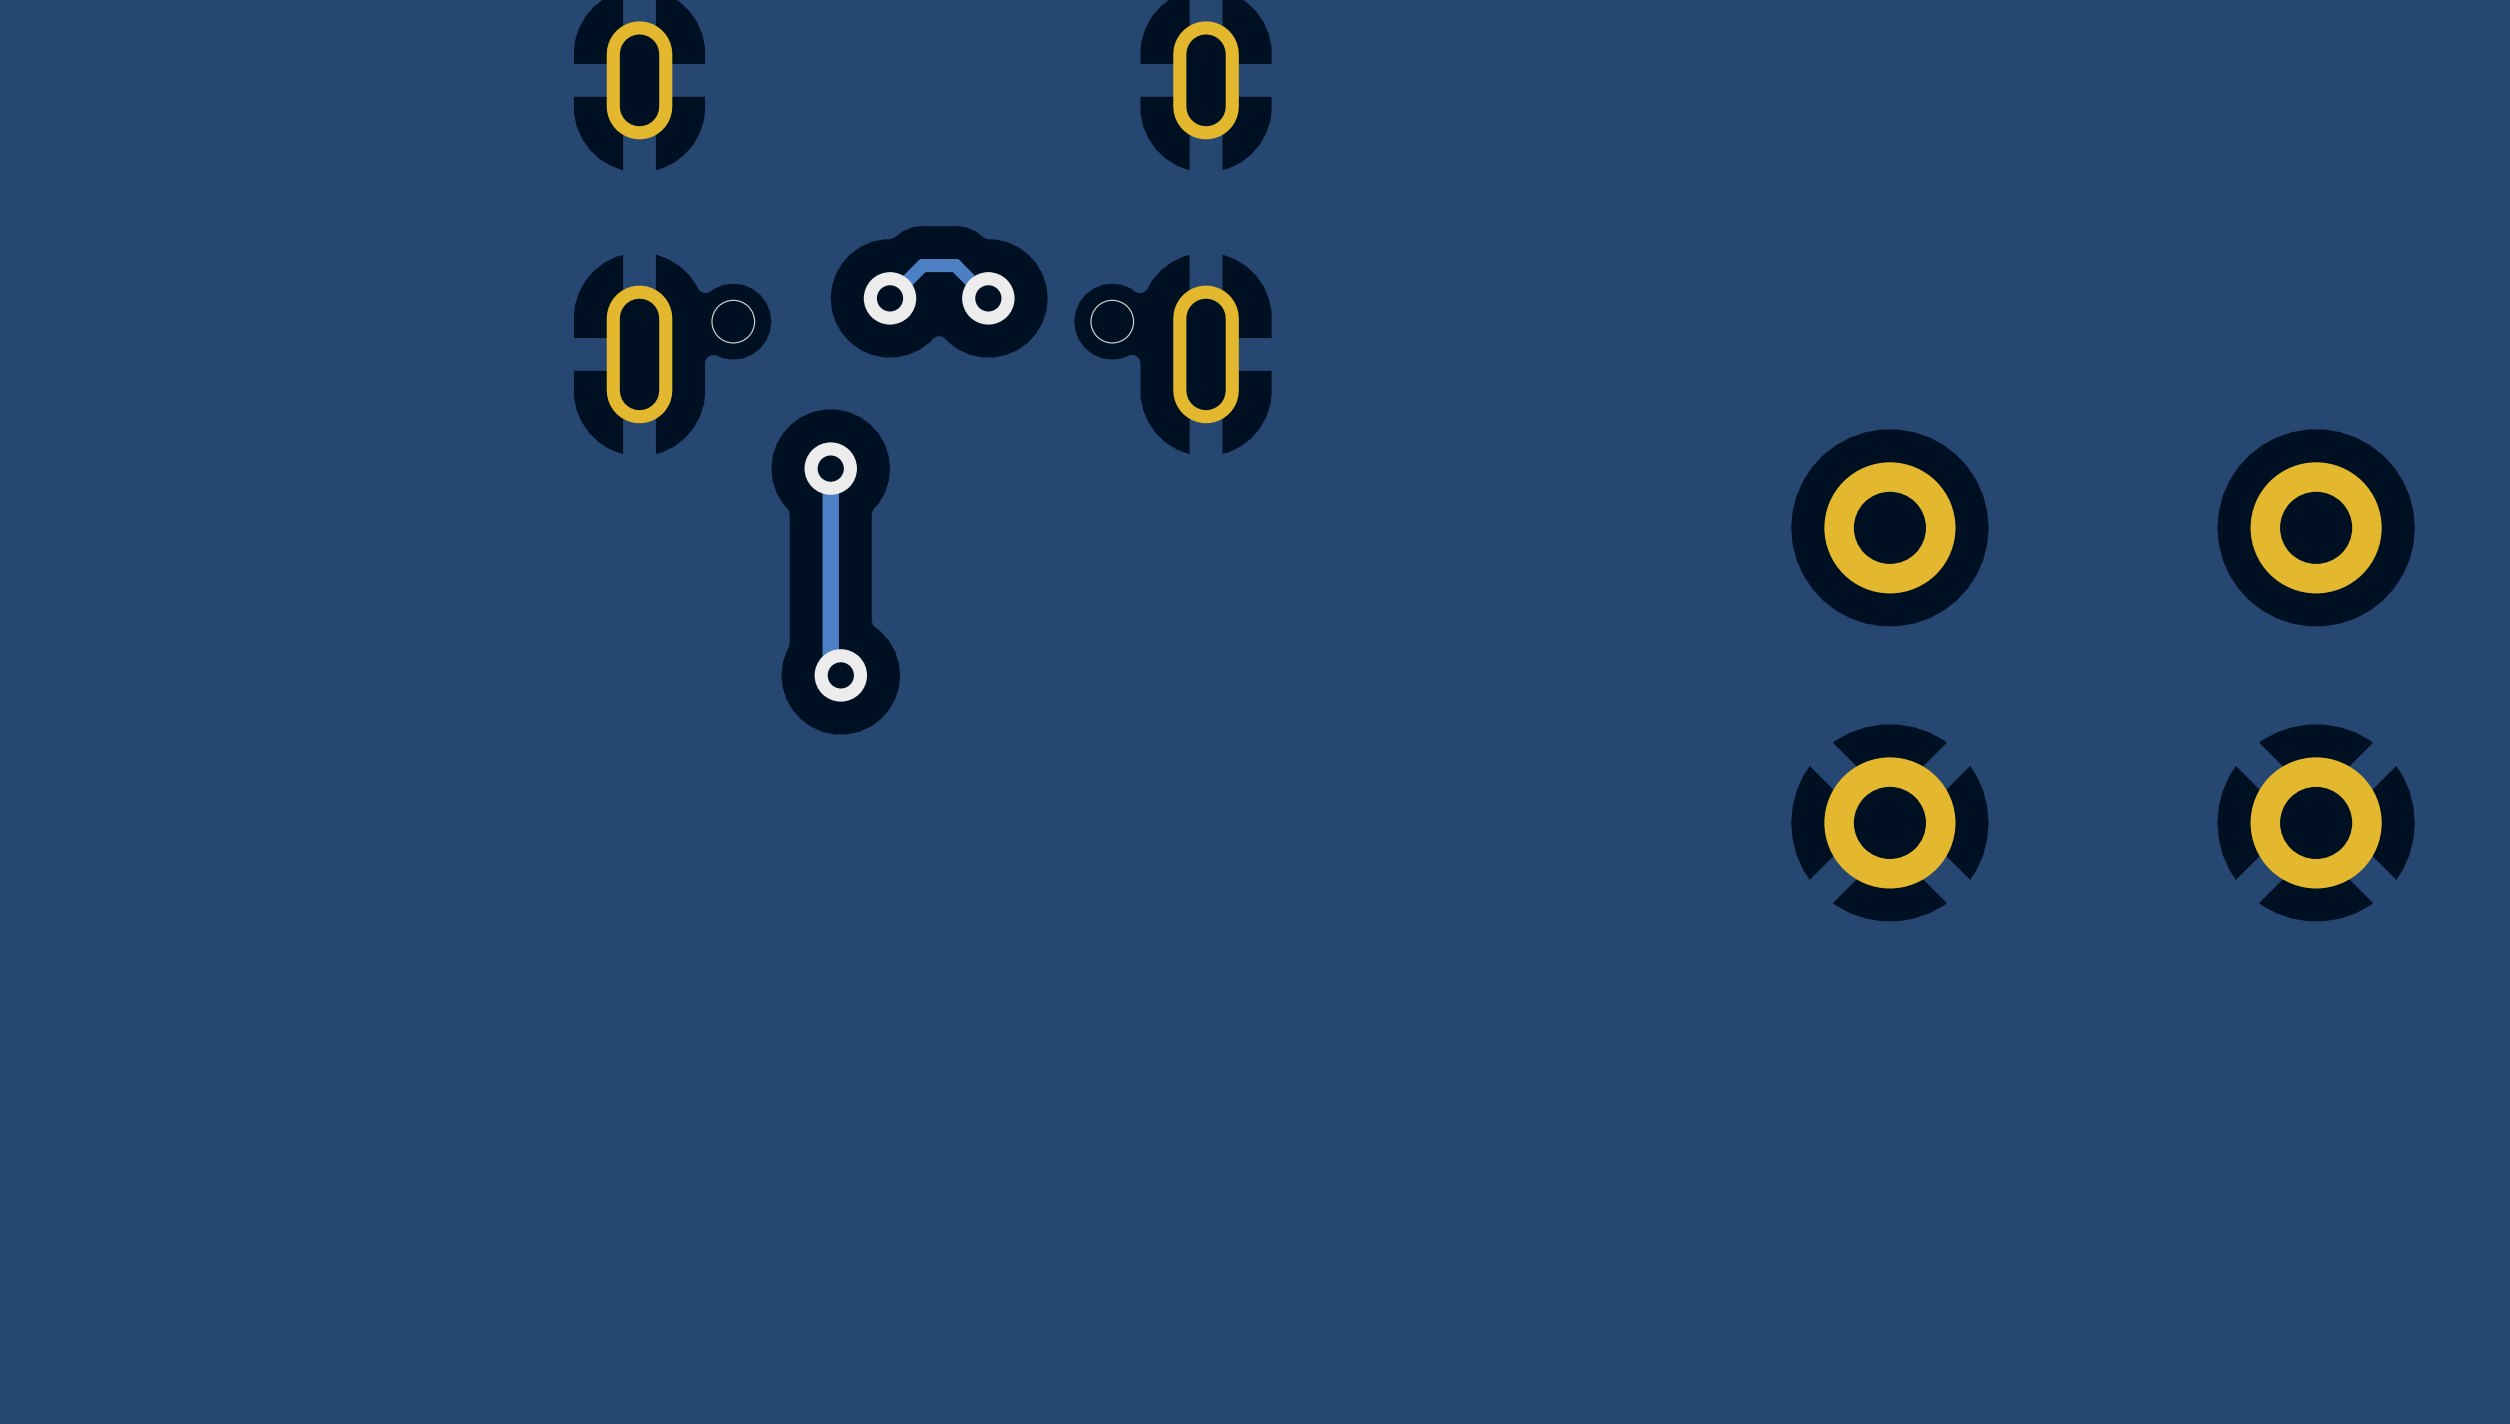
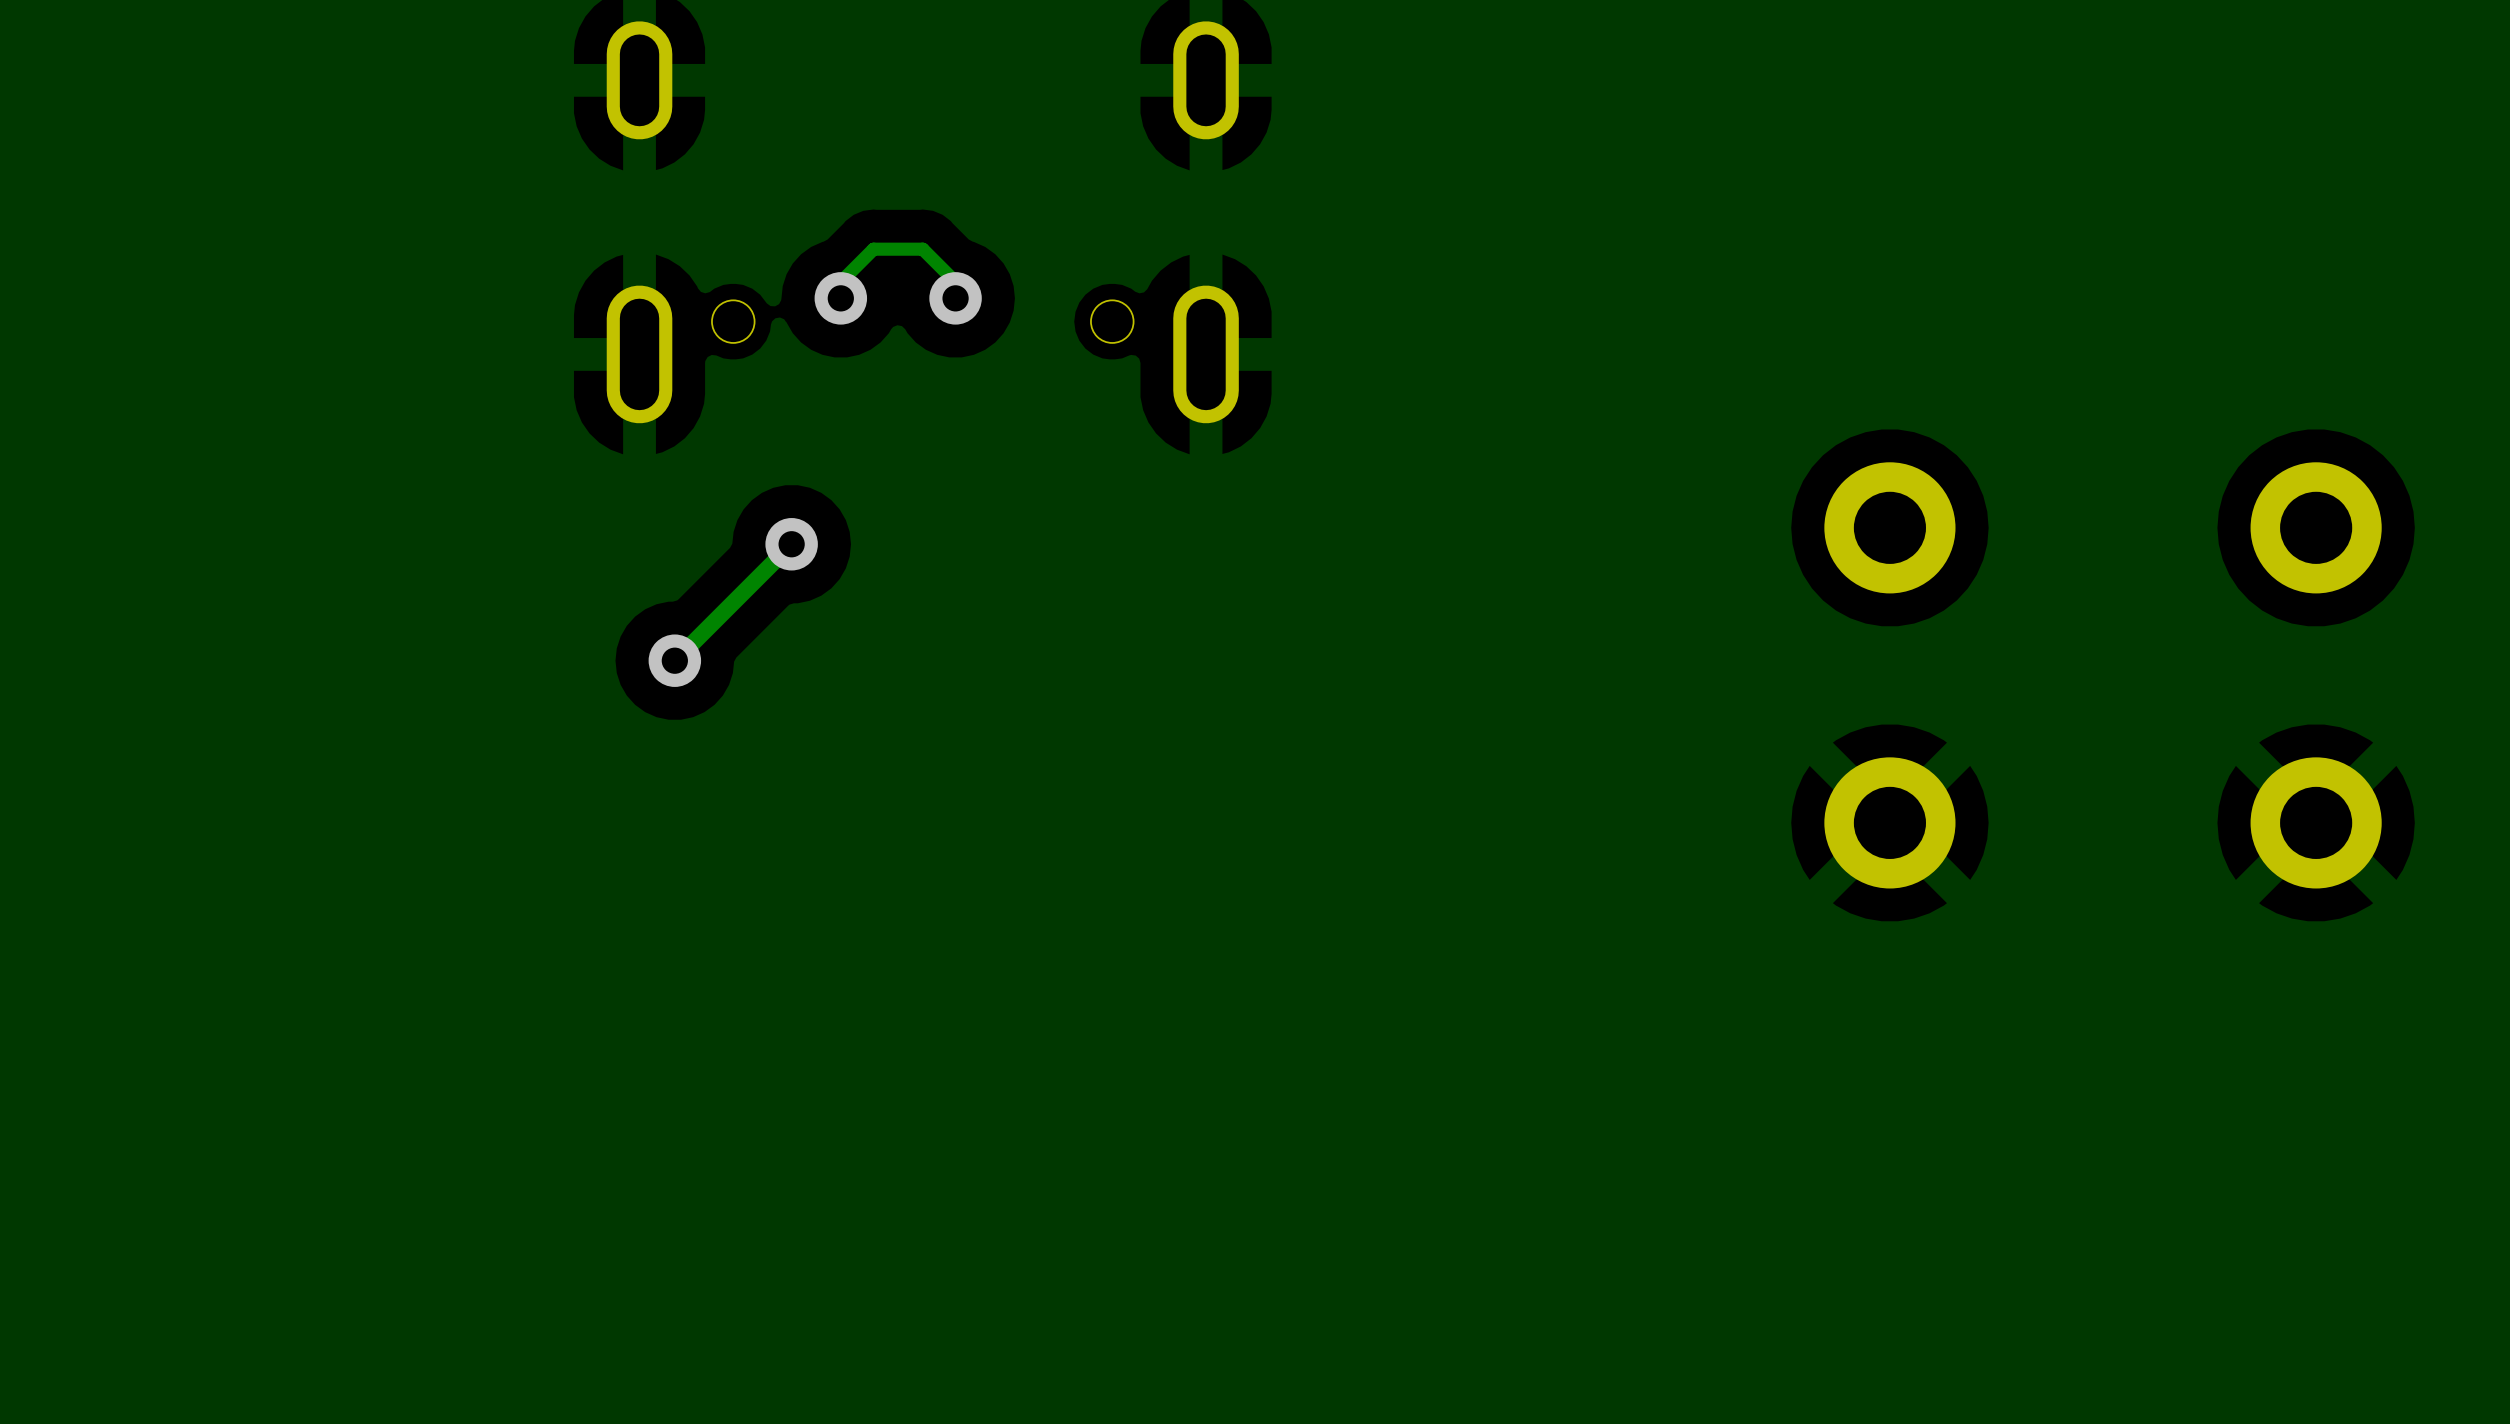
via position: (889, 298) -> (840, 298)
track: none -> (955, 298) (955, 281) (922, 249) (873, 249) (840, 281) (840, 298)
track: (988, 298) (955, 265) (922, 265) (889, 298) -> none
via position: (988, 298) -> (955, 298)
track: (830, 468) (830, 665) (840, 675) -> none
via: (830, 468) -> none
track: none -> (791, 544) (675, 660)
via: none -> (791, 544)
via: none -> (674, 660)
via: (840, 675) -> none

